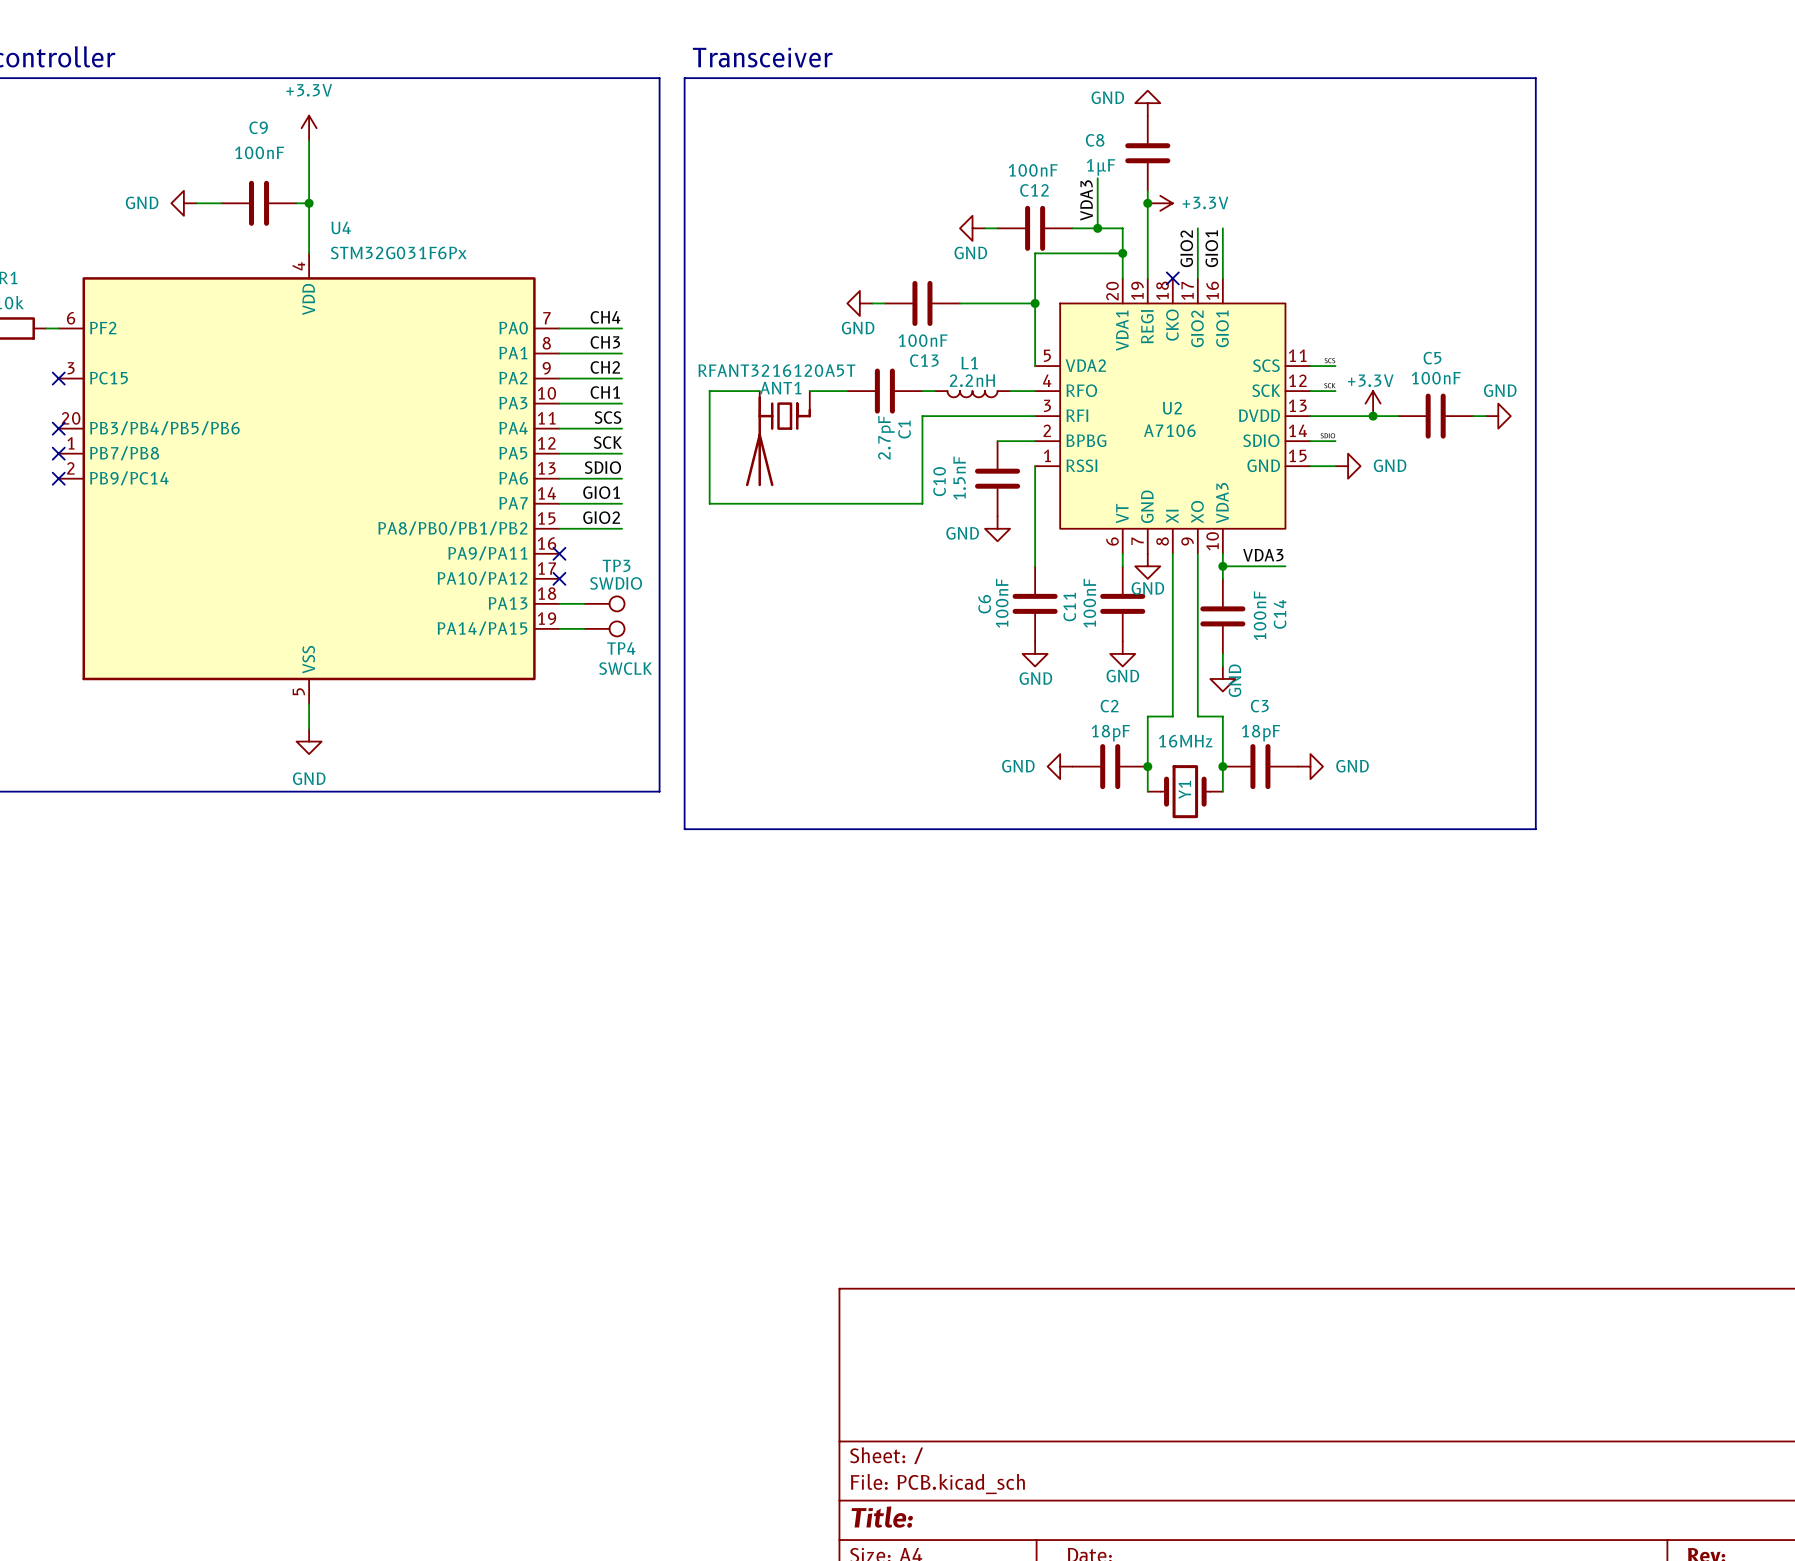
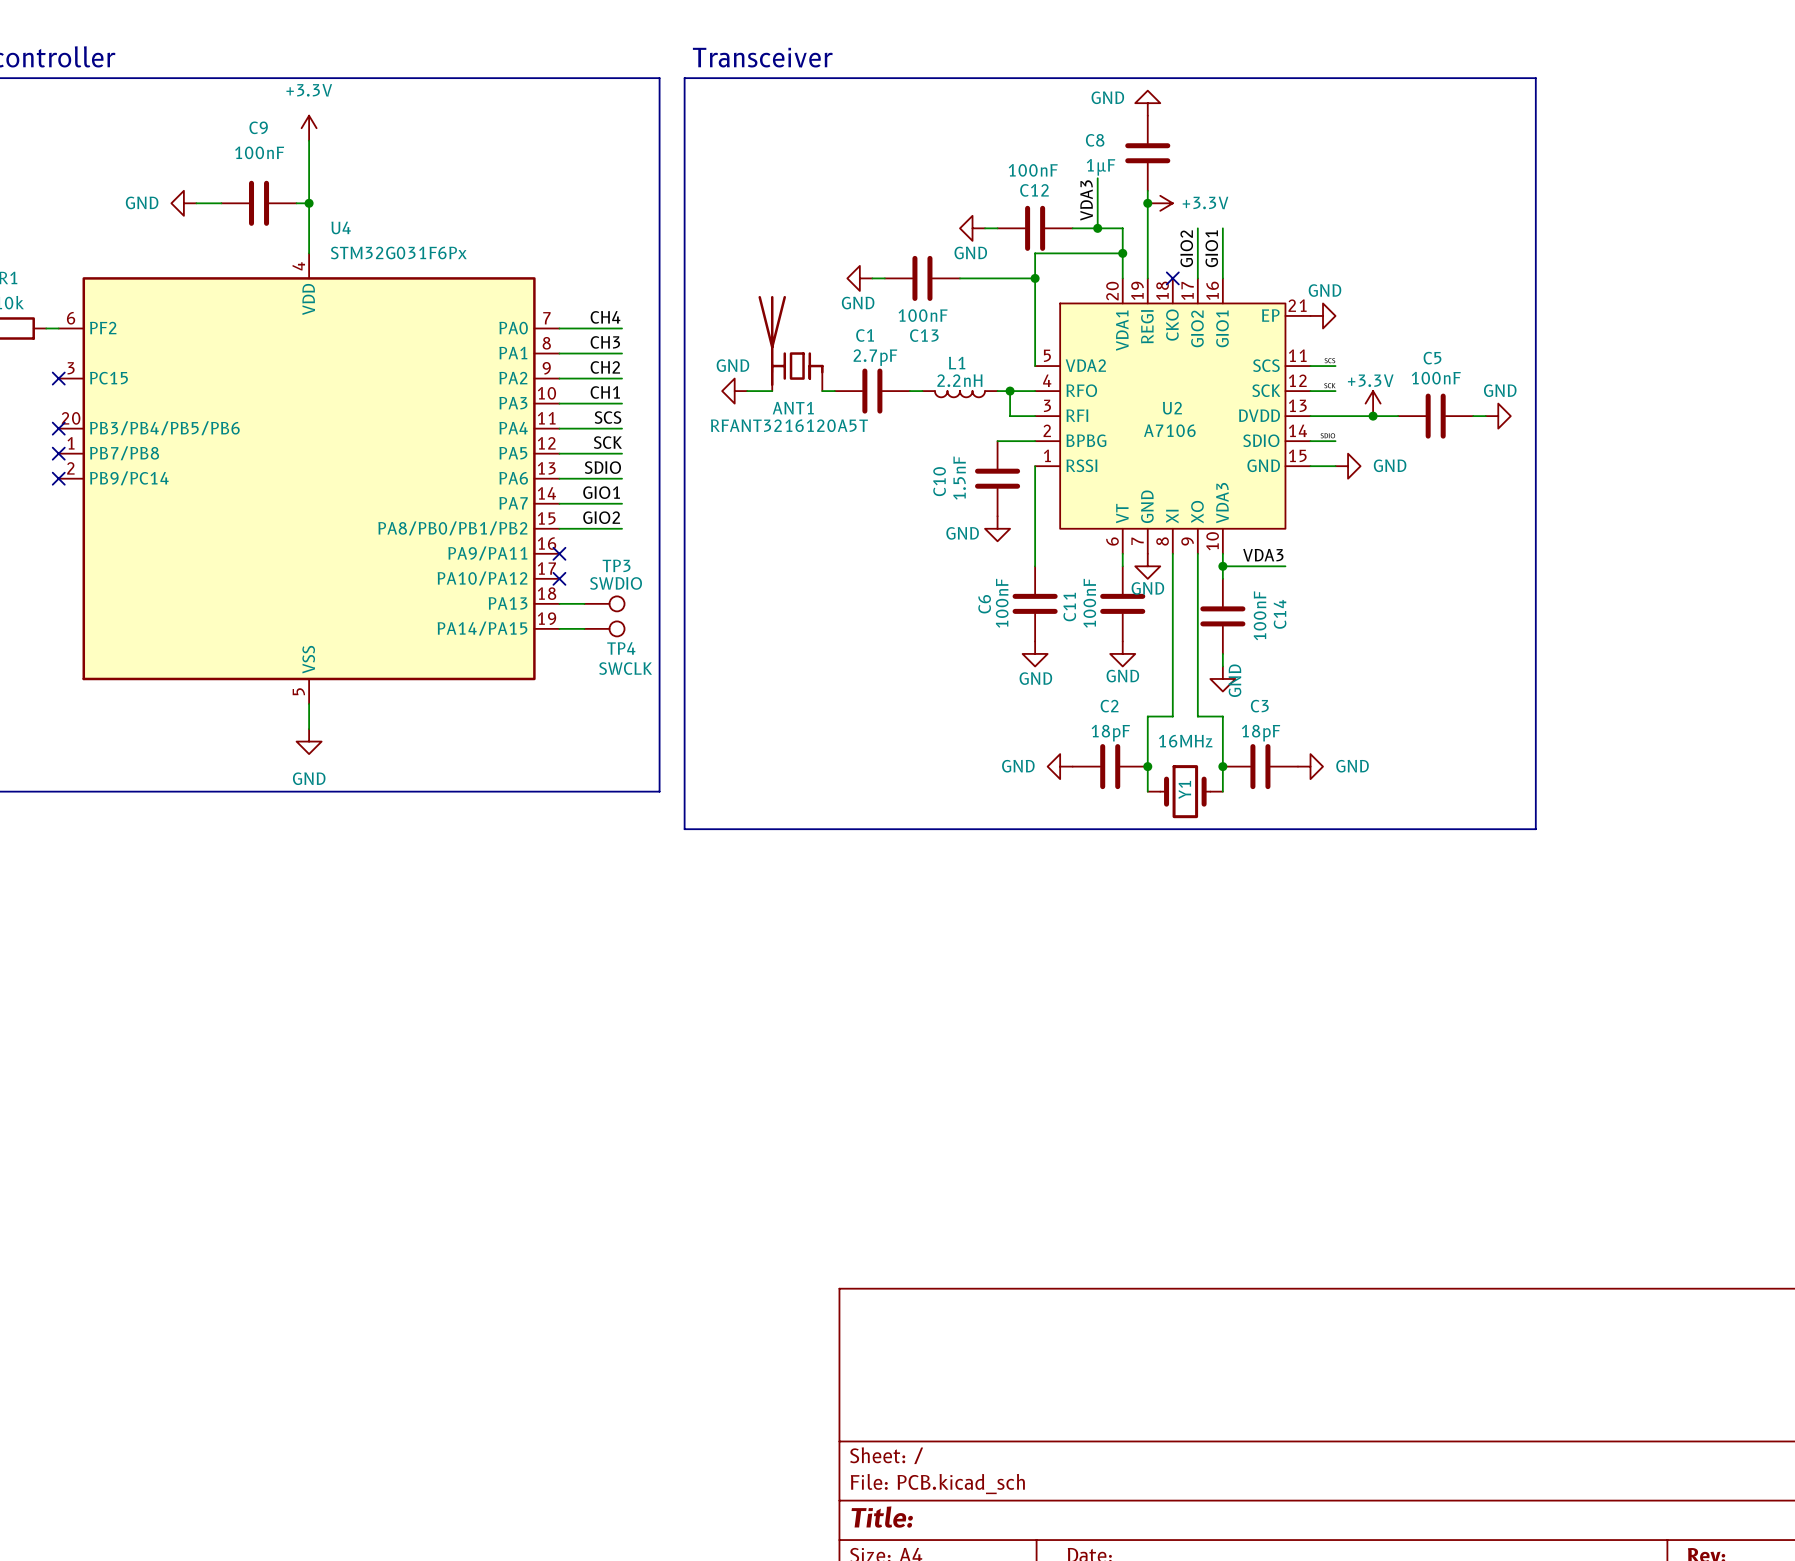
U2 symbol: [1035, 278, 1311, 554] -> [1035, 278, 1311, 554]
power symbol position: GND (859, 303) -> GND (859, 278)
wire: (872, 303) (884, 303) -> (872, 278) (884, 278)
C13 position: (922, 303) -> (922, 278)
wire: (960, 303) (1035, 303) -> (960, 278) (1035, 278)
junction position: (1035, 303) -> (1035, 278)
power symbol: none -> GND (1323, 315)
power symbol: none -> GND (734, 391)
wire: (747, 391) (709, 391) (709, 503) (922, 503) (922, 416) (1010, 416) -> (997, 391) (1010, 391) (1010, 416)
wire: (809, 391) (822, 391) -> (759, 391) (772, 391)
C1 position: (884, 391) -> (872, 391)
junction: none -> (1010, 391)
L1 position: (972, 394) -> (960, 394)
C1 name rotation: 0° (904, 429) -> 90° clockwise (865, 335)
C1 name position: C1 (904, 429) -> C1 (865, 335)
C1 value rotation: 0° (886, 437) -> 90° clockwise (875, 357)
C1 value position: 2.7pF (886, 437) -> 2.7pF (875, 357)
ANT1 position: (778, 438) -> (791, 343)
ANT1 flip: as is (778, 441) -> up-down (791, 341)

